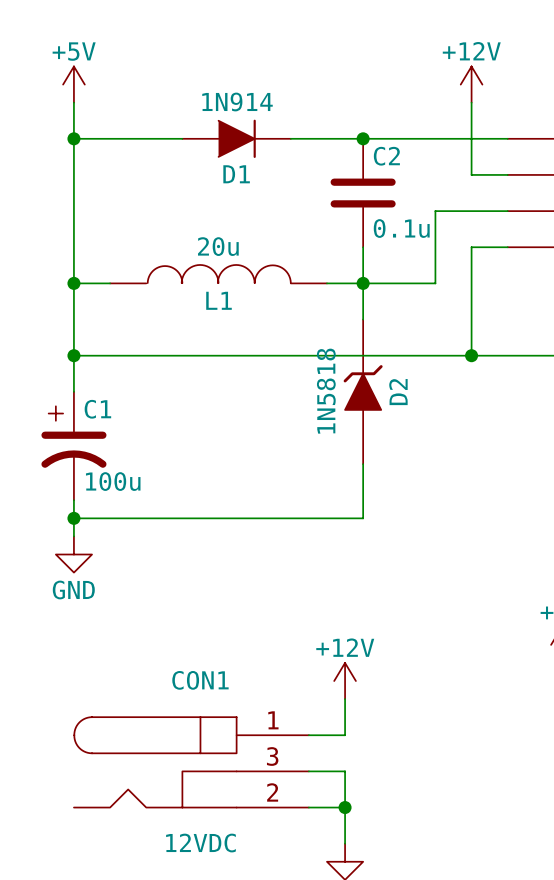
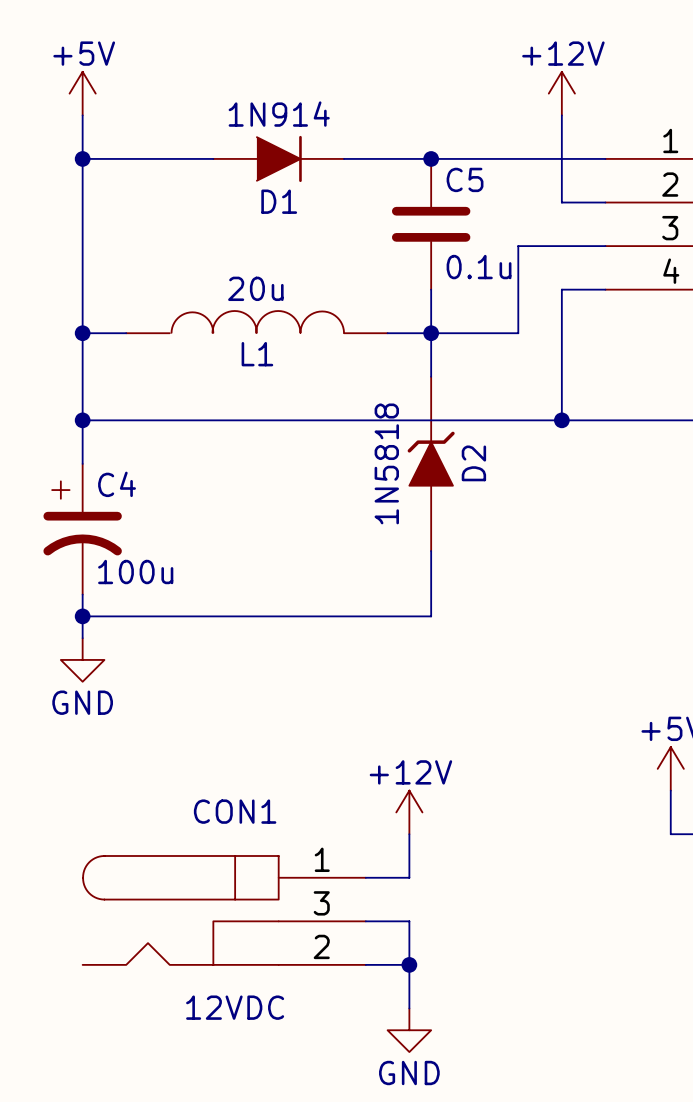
C2 name: C2 (386, 156) -> C5 (465, 179)
C1 name: C1 (97, 409) -> C4 (117, 484)

